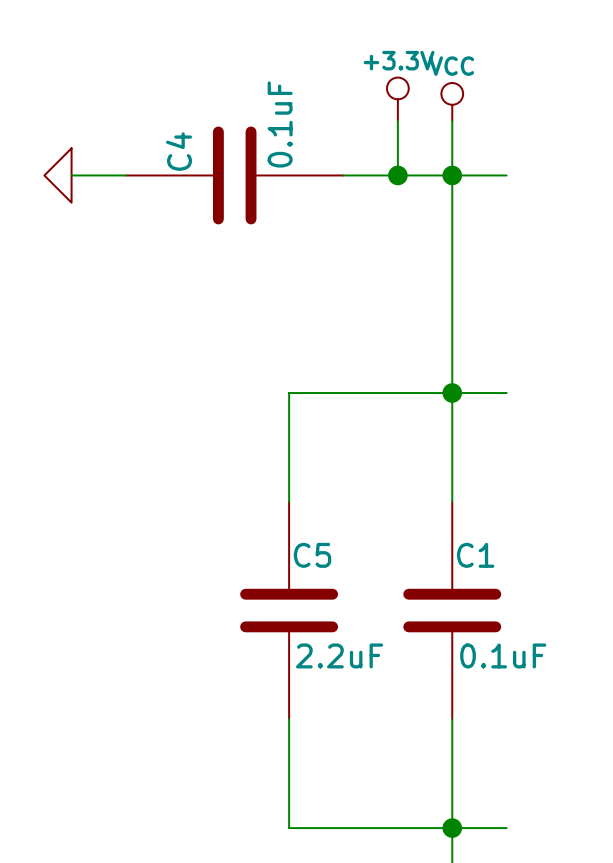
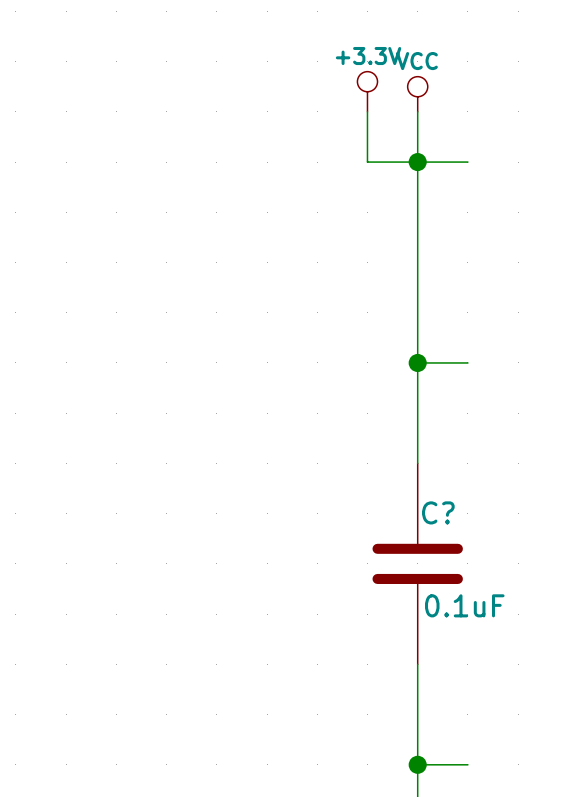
power symbol: (57, 175) -> none
wire: (71, 175) (125, 175) -> none
C4: 0.1uF (234, 175) -> none
wire: (343, 175) (397, 175) -> none
junction: (397, 175) -> none
wire: (452, 393) (289, 393) (289, 501) -> none
C1 name: C1 (475, 555) -> C? (438, 512)
C5: 2.2uF (289, 610) -> none
wire: (289, 719) (289, 828) (452, 828) -> none

